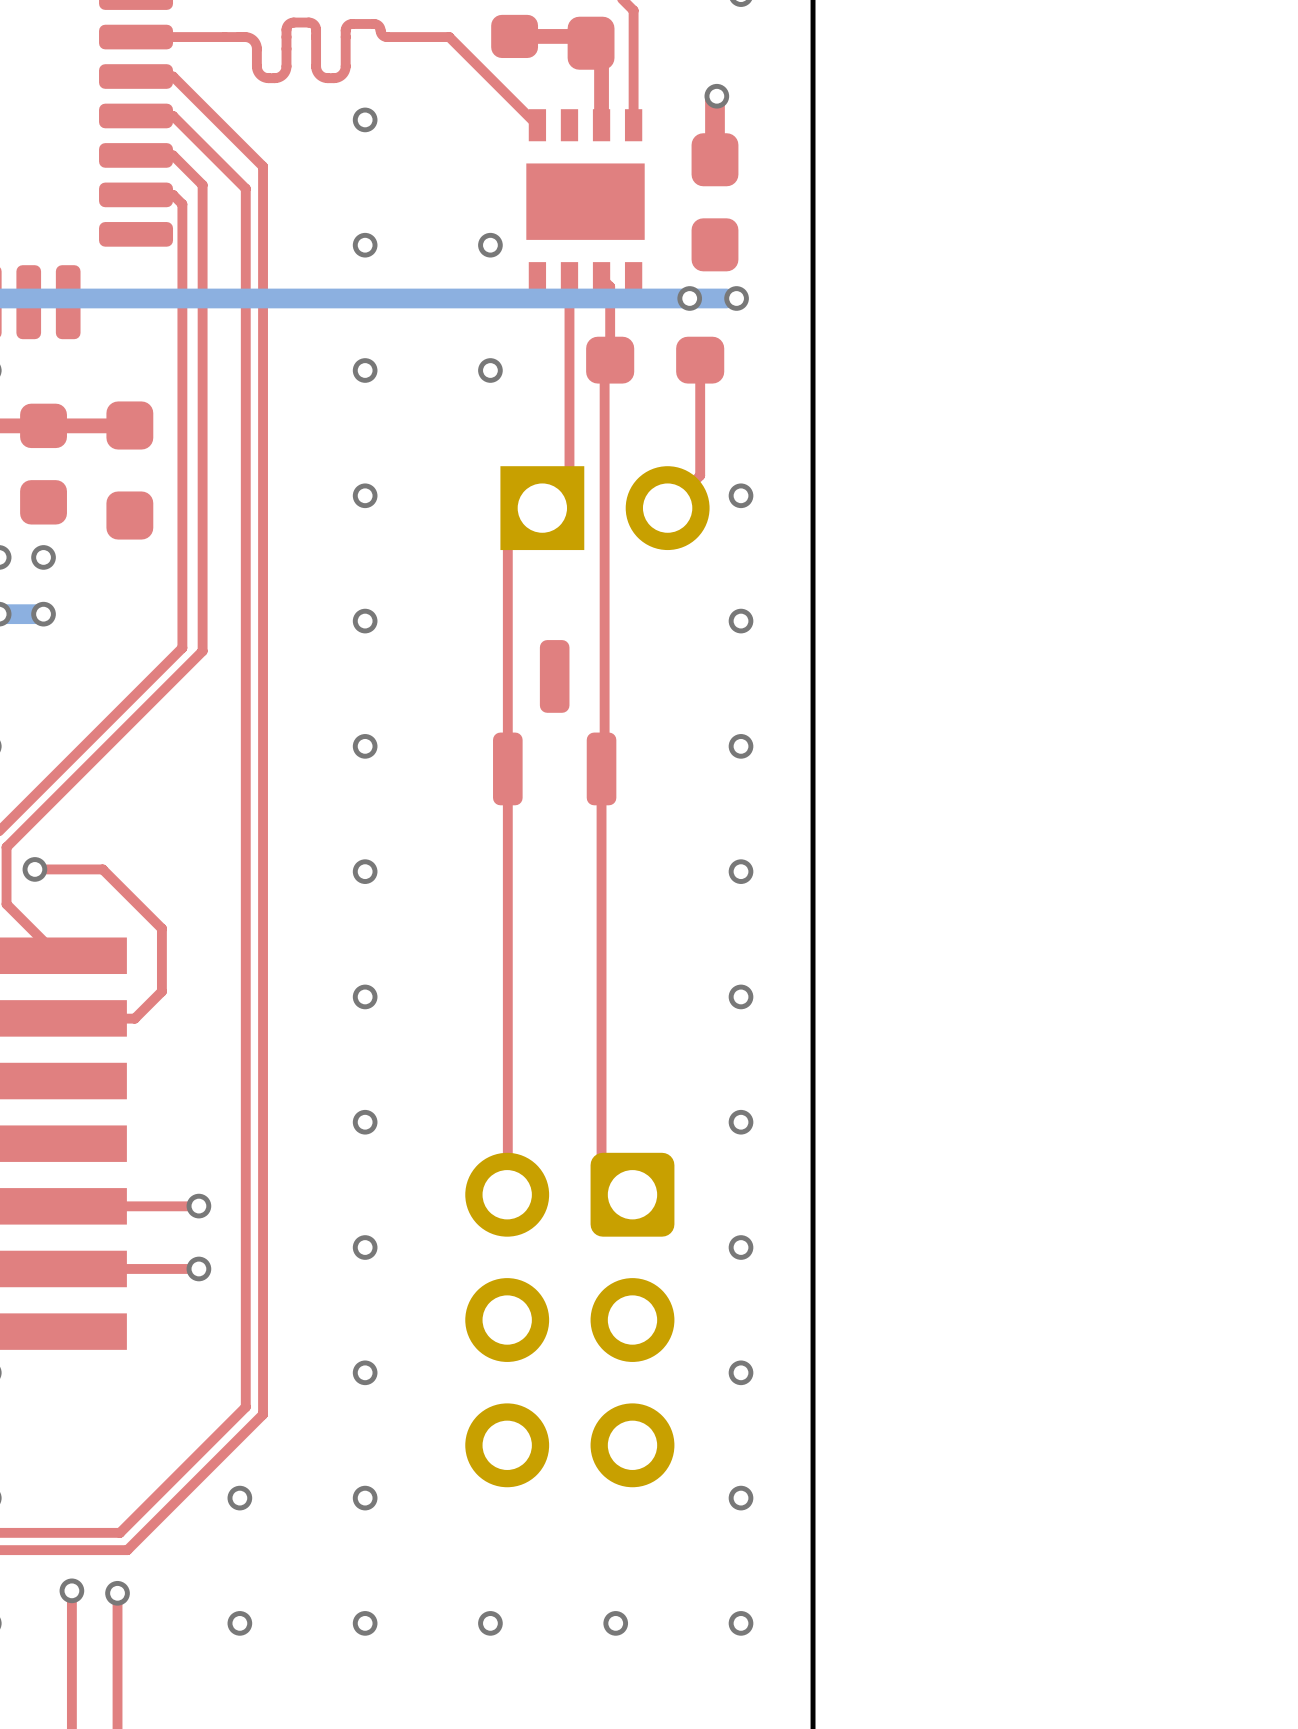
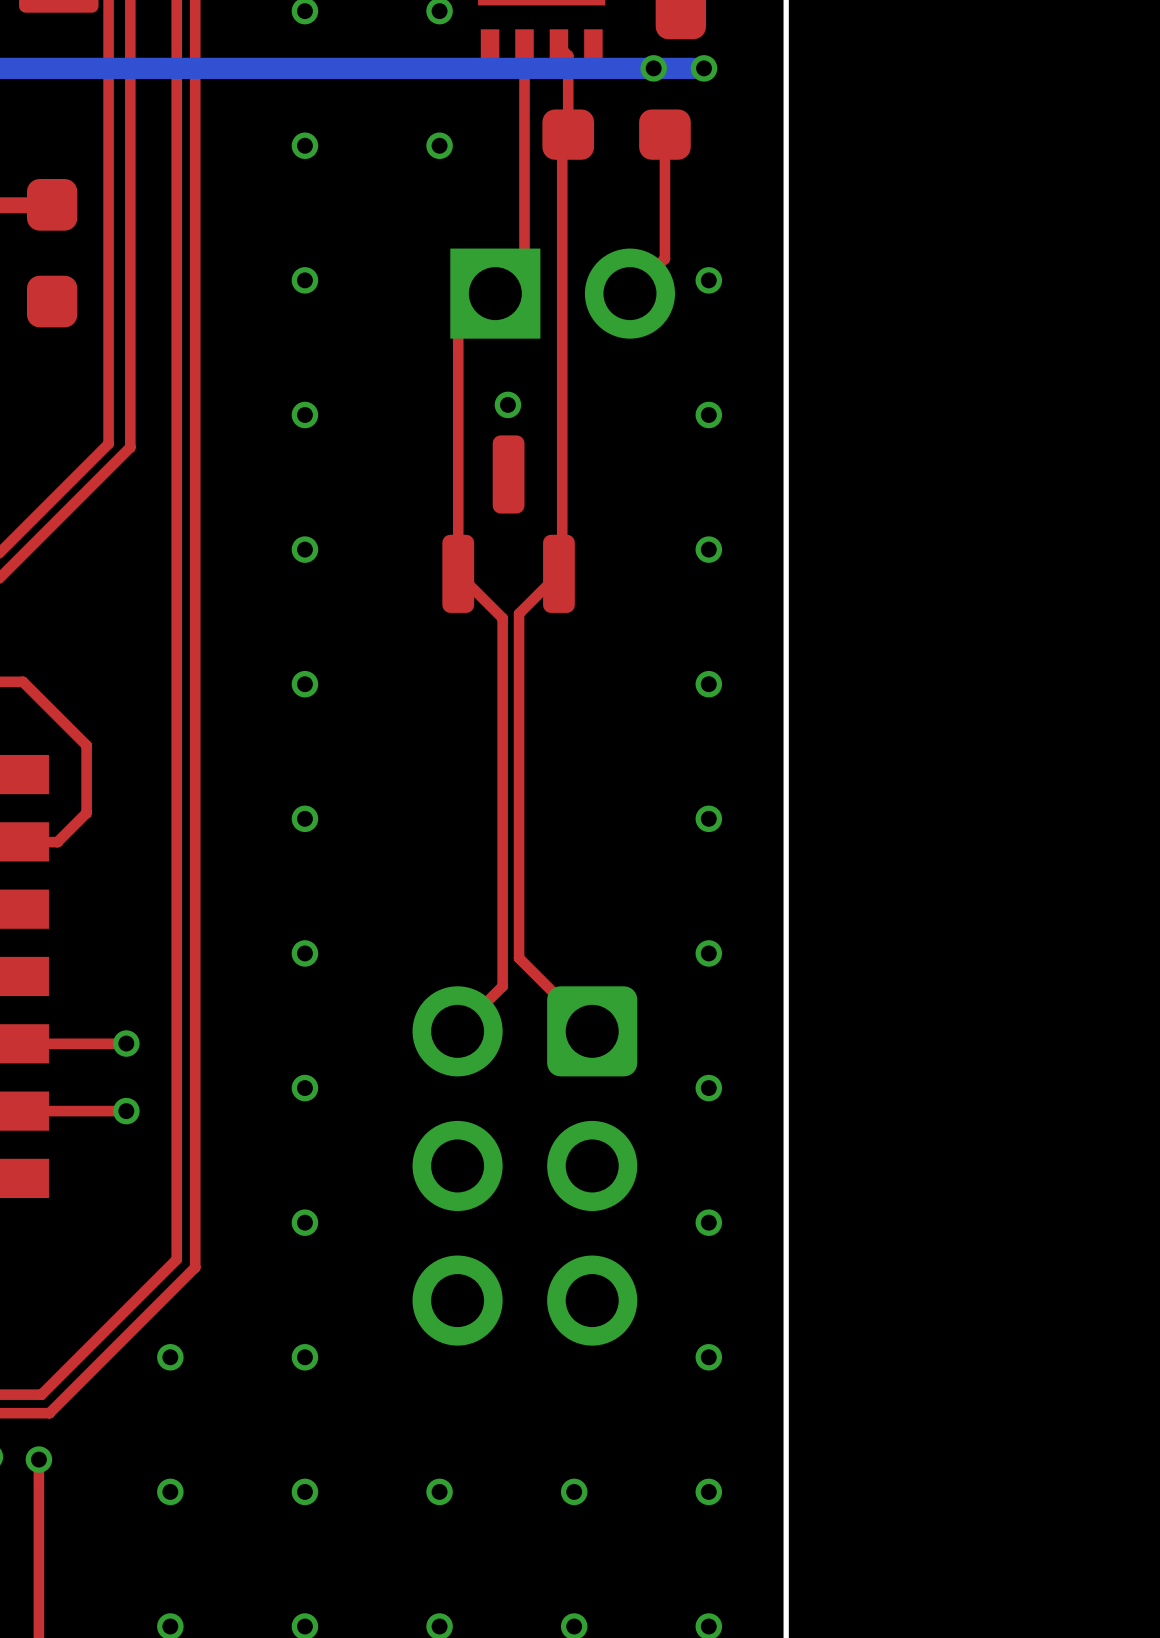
via: none -> (507, 404)
top track: (507, 768) (507, 1194) -> (458, 573) (502, 618) (502, 986) (458, 1030)
top track: (601, 768) (601, 1163) -> (558, 573) (519, 613) (519, 958) (558, 998)

